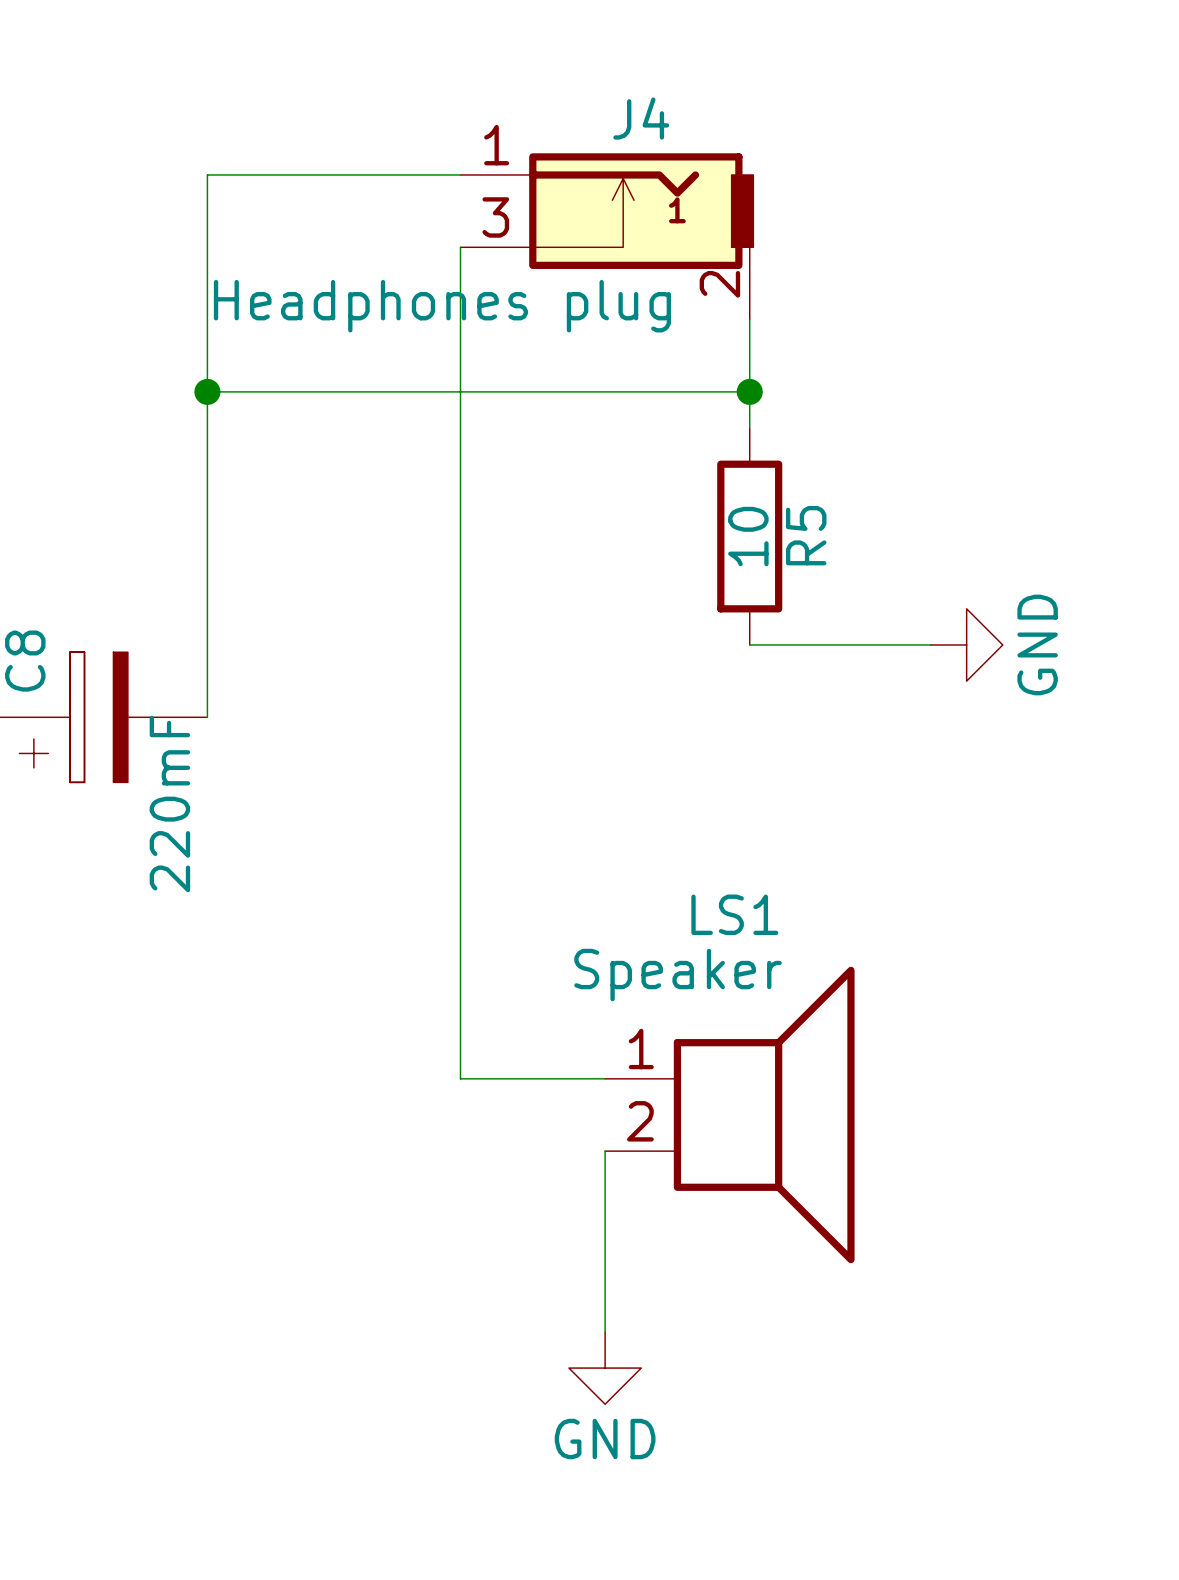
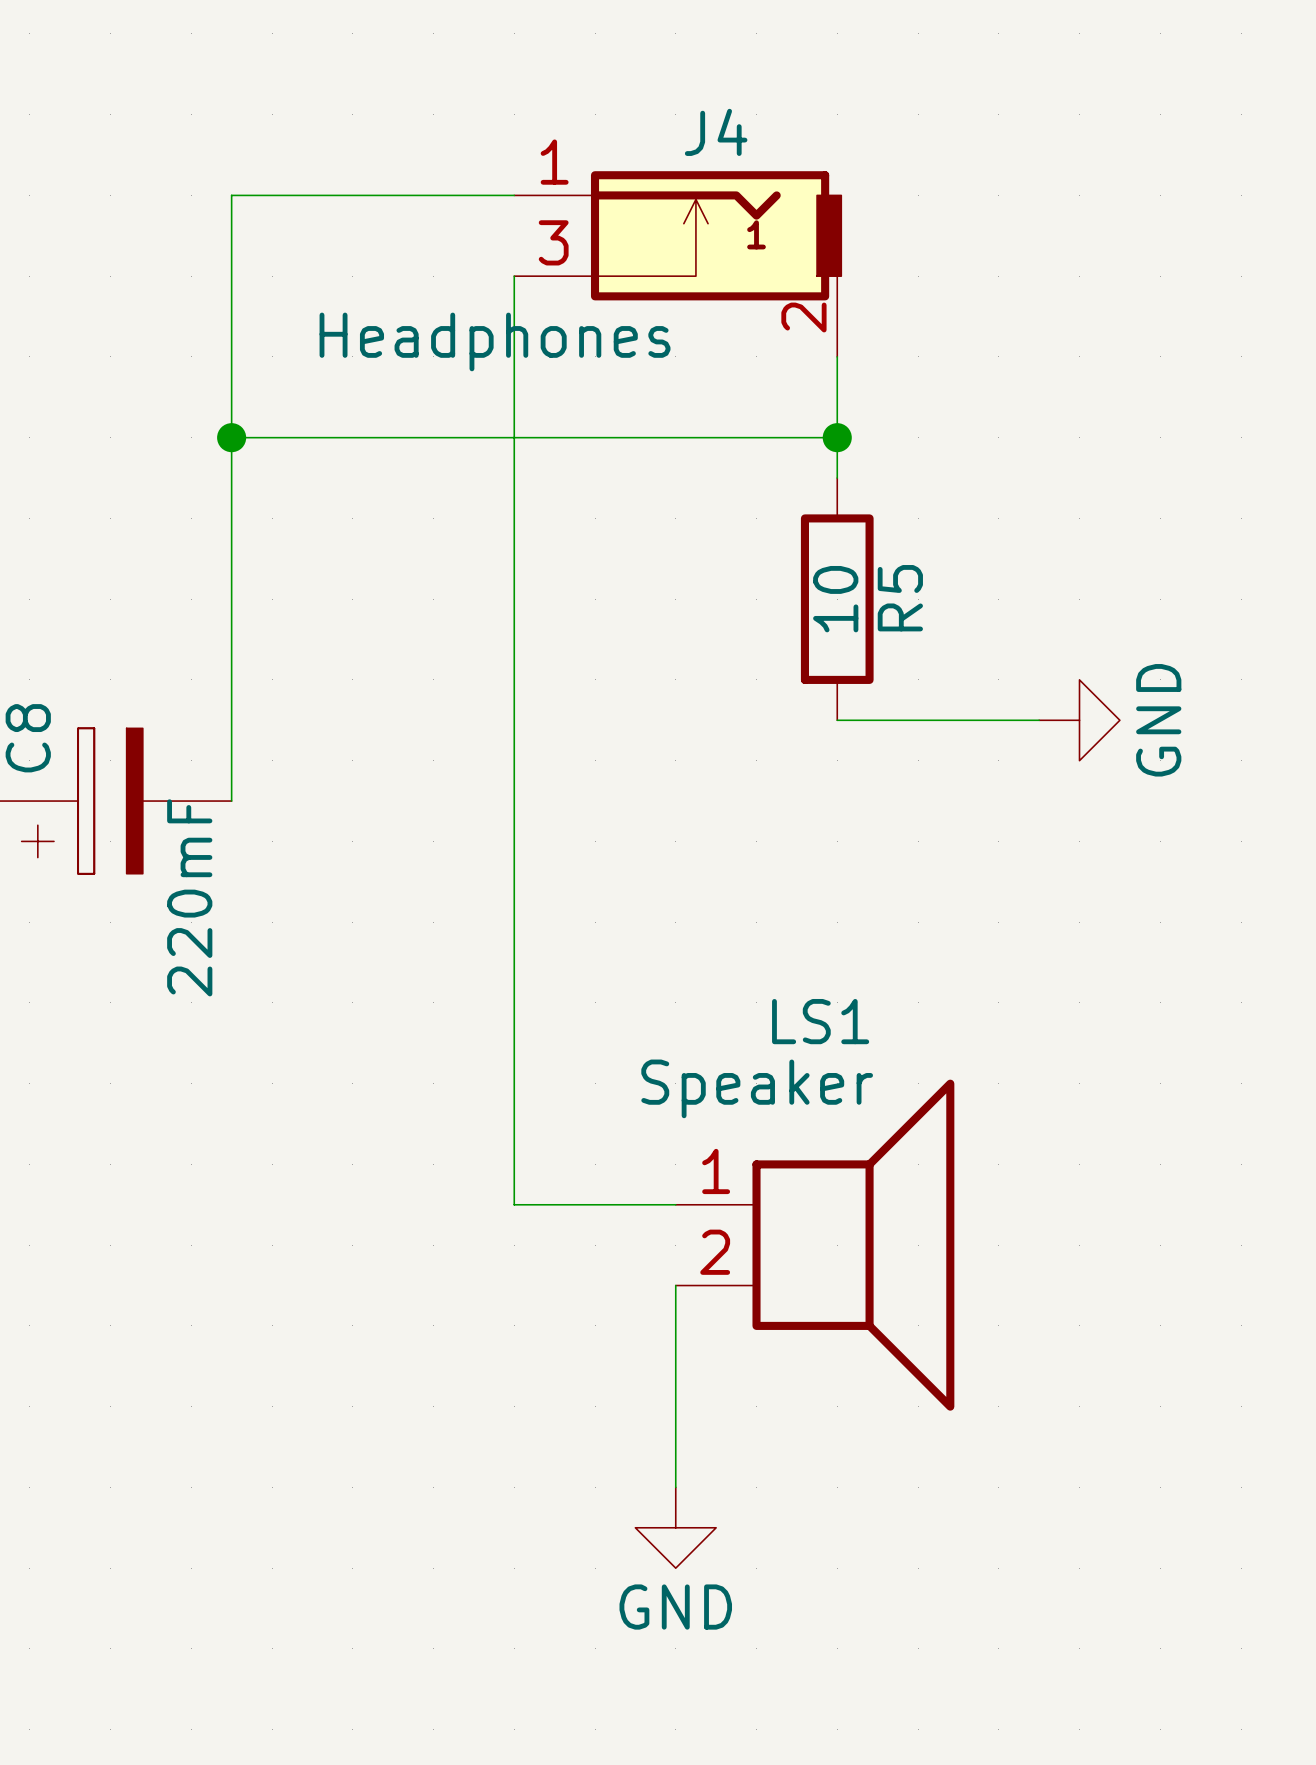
J4 value: Headphones plug (442, 306) -> Headphones (495, 341)

